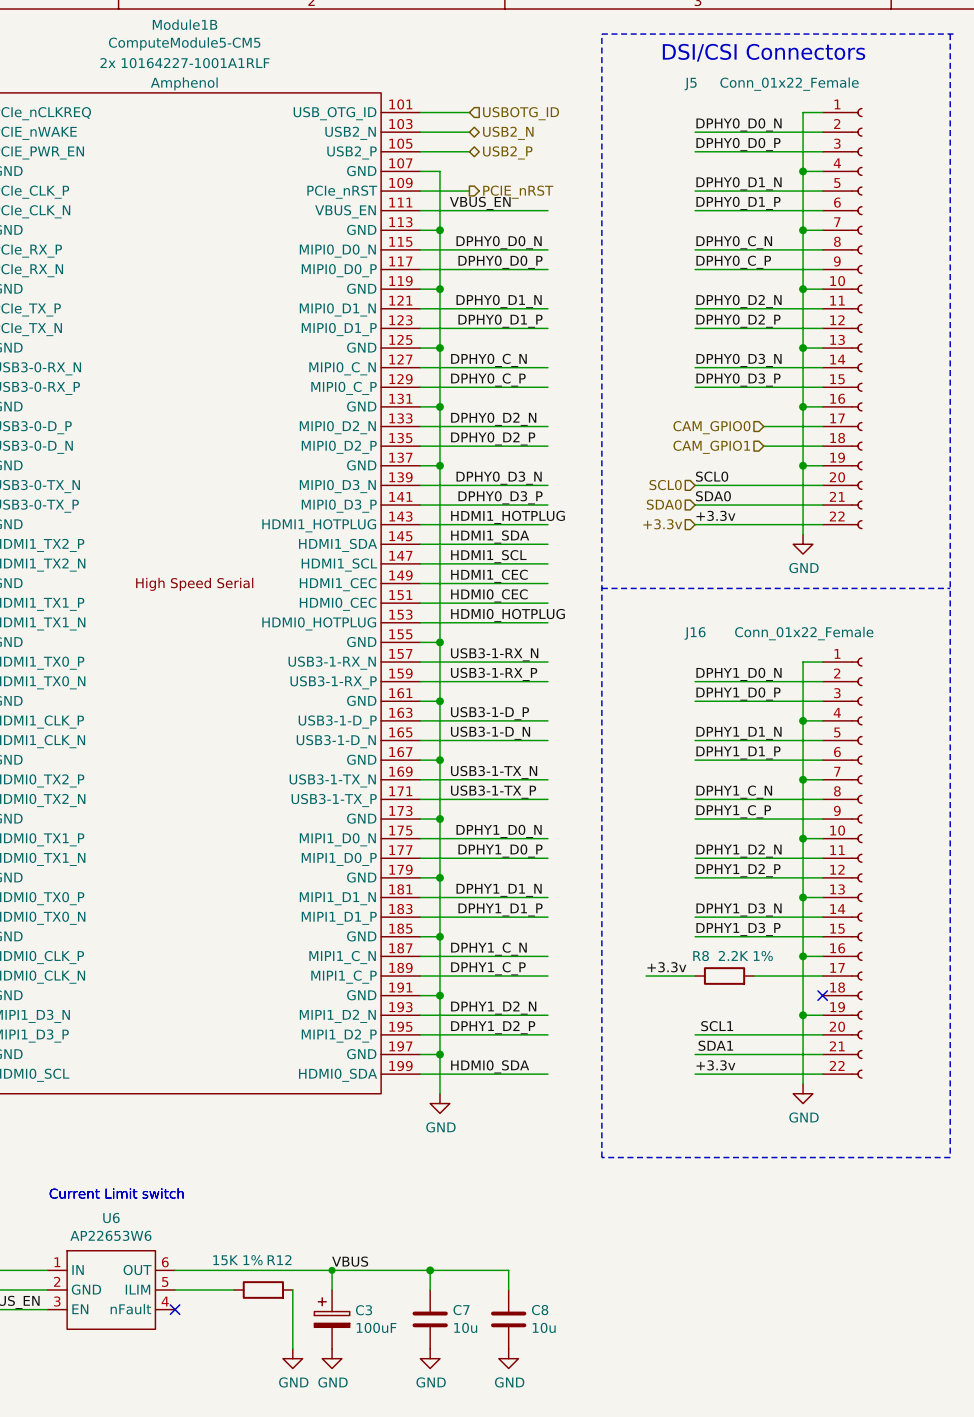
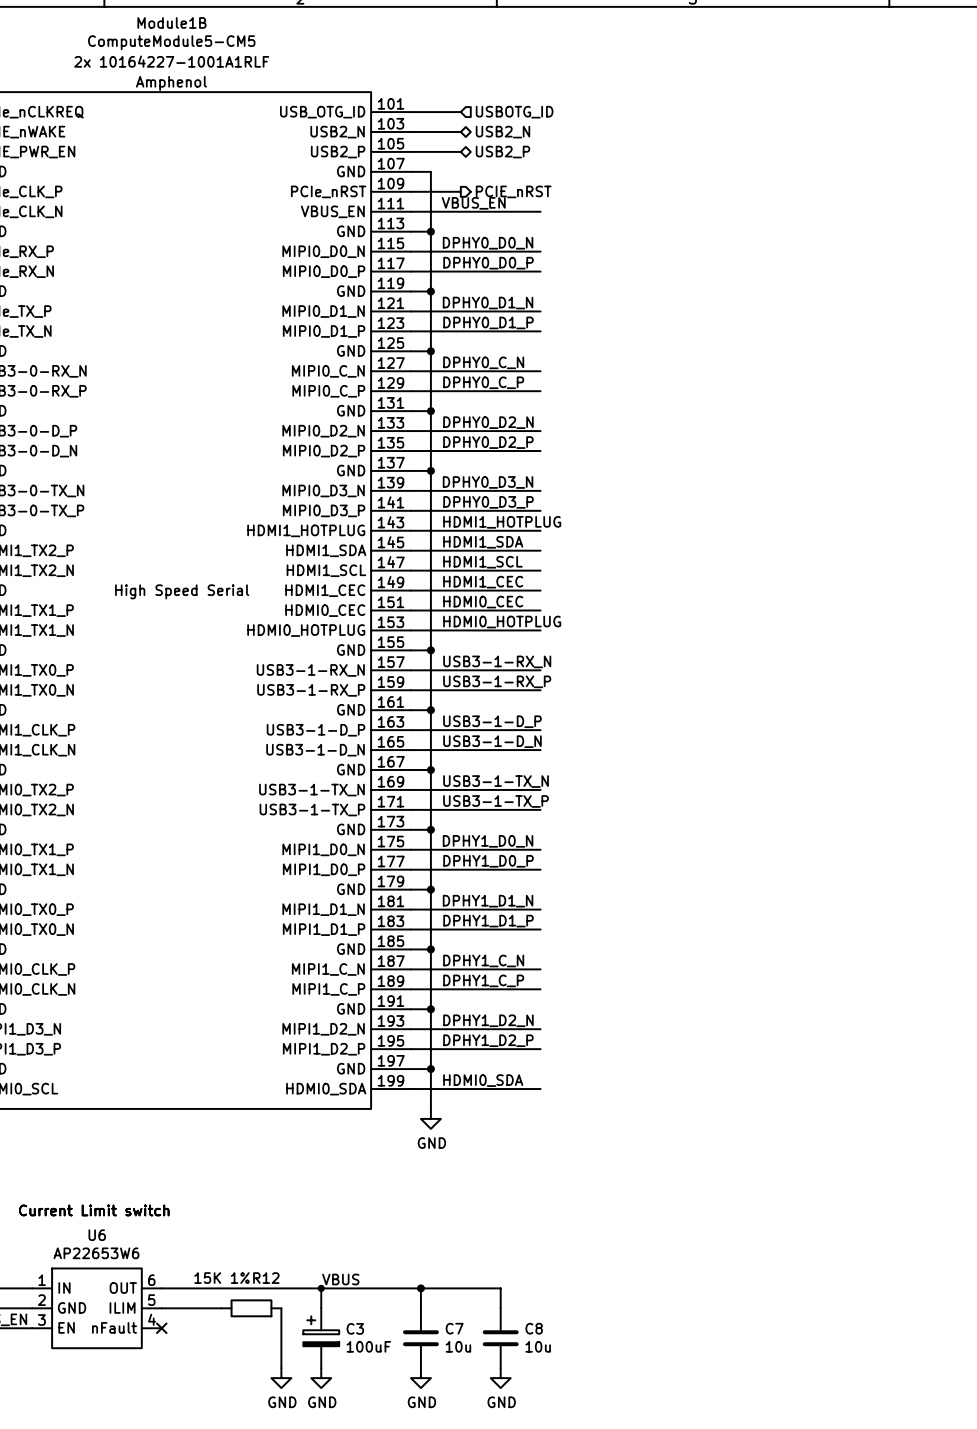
line: (950, 34) (950, 1157) (601, 1157) (601, 34) (954, 34) -> none
text: DSI/CSI Connectors (764, 52) -> none
wire: (822, 112) (803, 112) (803, 534) -> none
label: DPHY0_D0_N (739, 124) -> none
wire: (695, 132) (822, 132) -> none
label: DPHY0_D0_P (738, 144) -> none
wire: (695, 151) (822, 151) -> none
wire: (803, 171) (822, 171) -> none
junction: (803, 171) -> none
label: DPHY0_D1_N (739, 183) -> none
wire: (695, 191) (822, 191) -> none
label: DPHY0_D1_P (738, 203) -> none
wire: (695, 210) (822, 210) -> none
wire: (803, 230) (822, 230) -> none
junction: (803, 230) -> none
label: DPHY0_C_N (734, 242) -> none
wire: (695, 249) (822, 249) -> none
label: DPHY0_C_P (733, 262) -> none
wire: (695, 269) (822, 269) -> none
wire: (803, 289) (822, 289) -> none
junction: (803, 289) -> none
label: DPHY0_D2_N (739, 301) -> none
wire: (695, 308) (822, 308) -> none
J5: Conn_01x22_Female (842, 318) -> none
label: DPHY0_D2_P (738, 321) -> none
wire: (695, 328) (822, 328) -> none
wire: (803, 348) (822, 348) -> none
junction: (803, 348) -> none
label: DPHY0_D3_N (739, 360) -> none
wire: (695, 367) (822, 367) -> none
label: DPHY0_D3_P (738, 380) -> none
wire: (695, 387) (822, 387) -> none
wire: (803, 406) (822, 406) -> none
junction: (803, 406) -> none
wire: (763, 426) (822, 426) -> none
hierarchical label: CAM_GPIO0 (711, 427) -> none
wire: (763, 446) (822, 446) -> none
hierarchical label: CAM_GPIO1 (711, 447) -> none
wire: (803, 465) (822, 465) -> none
junction: (803, 465) -> none
label: SCL0 (712, 476) -> none
hierarchical label: SCL0 (665, 485) -> none
wire: (695, 485) (822, 485) -> none
label: SDA0 (713, 496) -> none
hierarchical label: SDA0 (664, 504) -> none
wire: (695, 505) (822, 505) -> none
label: +3.3v (715, 515) -> none
hierarchical label: +3.3v (662, 524) -> none
wire: (695, 524) (822, 524) -> none
power symbol: GND (803, 544) -> none
line: (601, 588) (950, 588) -> none
wire: (822, 662) (803, 662) (803, 1083) -> none
label: DPHY1_D0_N (739, 674) -> none
wire: (695, 681) (822, 681) -> none
label: DPHY1_D0_P (738, 694) -> none
wire: (695, 701) (822, 701) -> none
wire: (803, 720) (822, 720) -> none
junction: (803, 720) -> none
label: DPHY1_D1_N (739, 733) -> none
wire: (695, 740) (822, 740) -> none
label: DPHY1_D1_P (738, 752) -> none
wire: (695, 760) (822, 760) -> none
wire: (803, 779) (822, 779) -> none
junction: (803, 779) -> none
label: DPHY1_C_N (734, 792) -> none
wire: (695, 799) (822, 799) -> none
label: DPHY1_C_P (733, 811) -> none
wire: (695, 819) (822, 819) -> none
wire: (803, 838) (822, 838) -> none
junction: (803, 838) -> none
label: DPHY1_D2_N (739, 851) -> none
wire: (695, 858) (822, 858) -> none
J16: Conn_01x22_Female (842, 868) -> none
label: DPHY1_D2_P (738, 870) -> none
wire: (695, 877) (822, 877) -> none
wire: (803, 897) (822, 897) -> none
junction: (803, 897) -> none
label: DPHY1_D3_N (739, 909) -> none
wire: (695, 917) (822, 917) -> none
label: DPHY1_D3_P (738, 929) -> none
wire: (695, 936) (822, 936) -> none
wire: (803, 956) (822, 956) -> none
junction: (803, 956) -> none
label: +3.3v (666, 967) -> none
wire: (646, 976) (695, 976) -> none
R8: 2.2K 1% (724, 976) -> none
wire: (753, 976) (822, 976) -> none
no-connect mark: (822, 995) -> none
wire: (803, 1015) (822, 1015) -> none
junction: (803, 1015) -> none
label: SCL1 (717, 1026) -> none
wire: (695, 1034) (822, 1034) -> none
label: SDA1 (715, 1045) -> none
wire: (695, 1054) (822, 1054) -> none
label: +3.3v (715, 1065) -> none
wire: (695, 1074) (822, 1074) -> none
power symbol: GND (803, 1093) -> none

